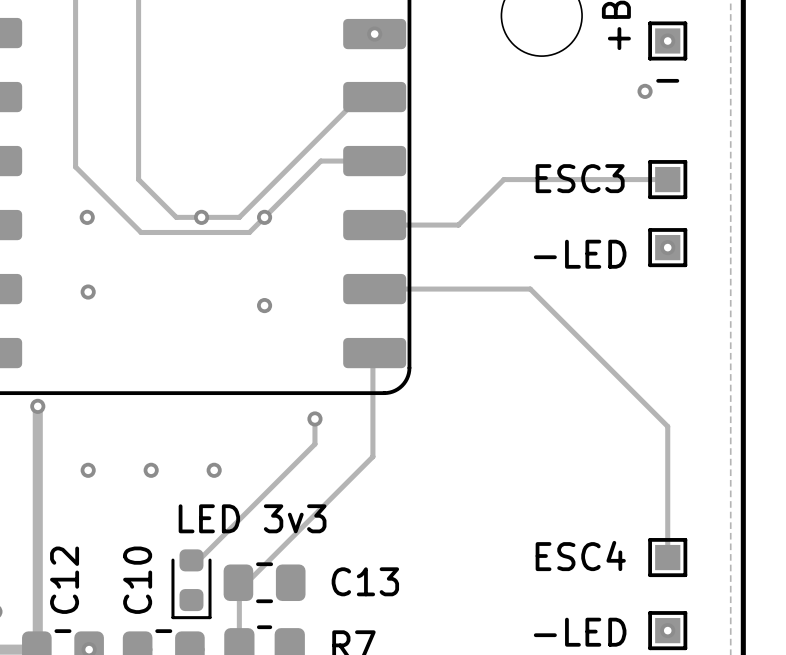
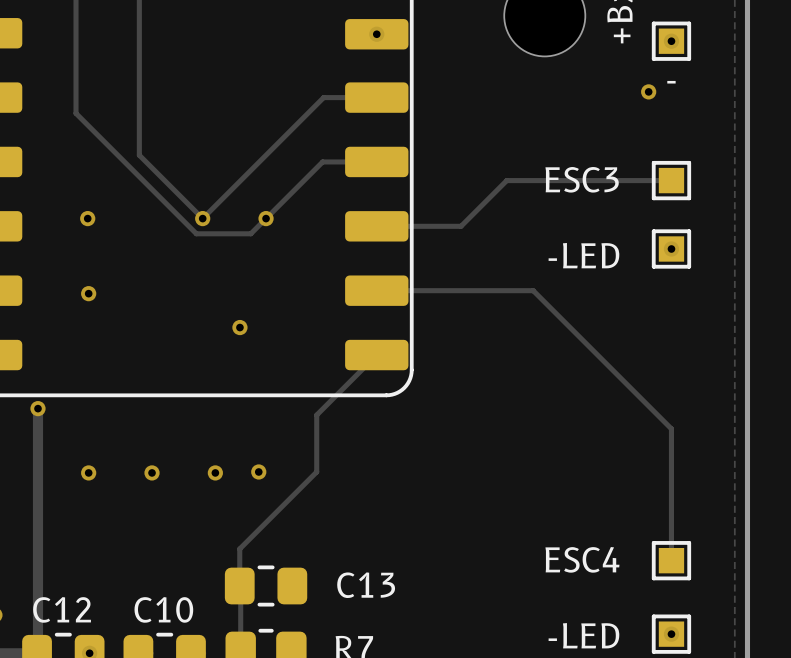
track: (359, 97) (239, 217) (176, 217) (138, 179) (138, 154) -> (361, 97) (323, 97) (205, 216)
track: (75, 112) (75, 166) (141, 232) (195, 232) -> (76, 113) (196, 233)
track: none -> (139, 155) (202, 218)
via position: (264, 305) -> (239, 327)
track: (372, 354) (372, 456) (246, 582) (238, 582) -> (375, 356) (316, 415) (316, 421)
via: (314, 418) -> none
track: (314, 444) (198, 560) (191, 560) -> (316, 446) (316, 471) (239, 548) (239, 586)
via: none -> (258, 471)
text: LED 3v3 (252, 518) -> none
C12 name rotation: 0° (64, 580) -> 90° clockwise (62, 609)
C10 name rotation: 0° (137, 580) -> 90° clockwise (163, 609)
part: (191, 584) -> none

